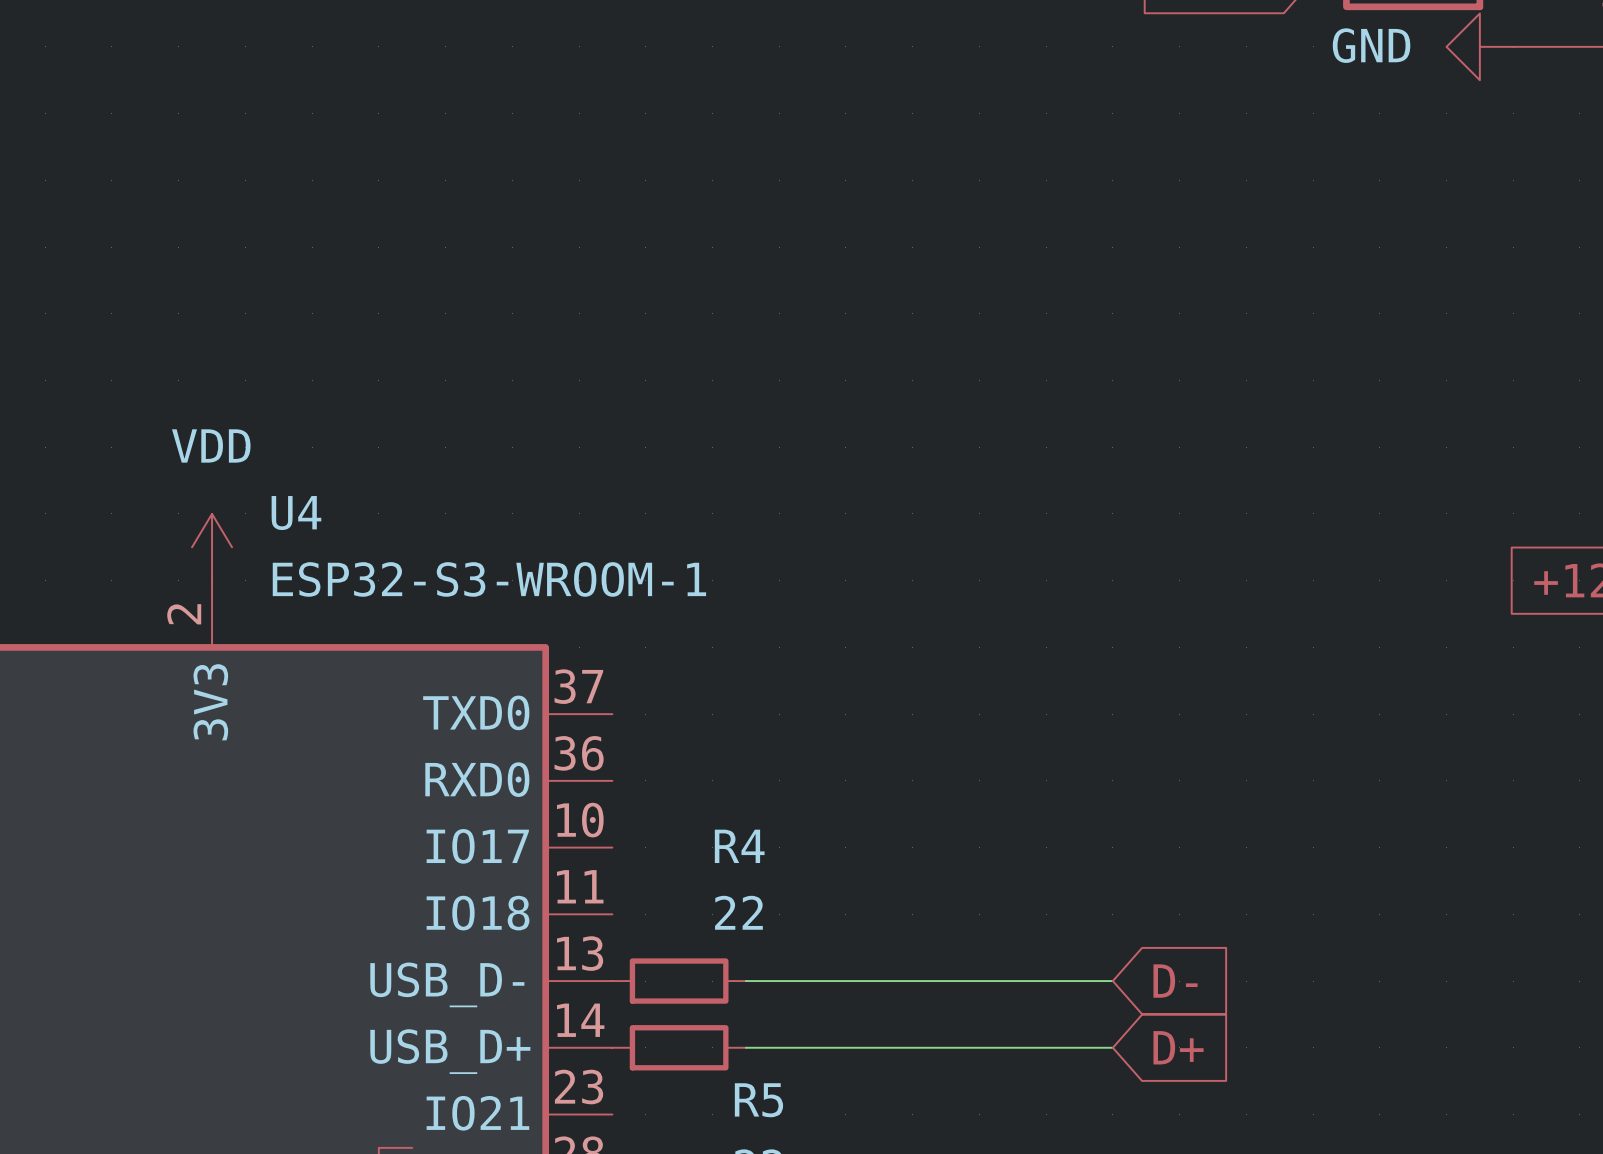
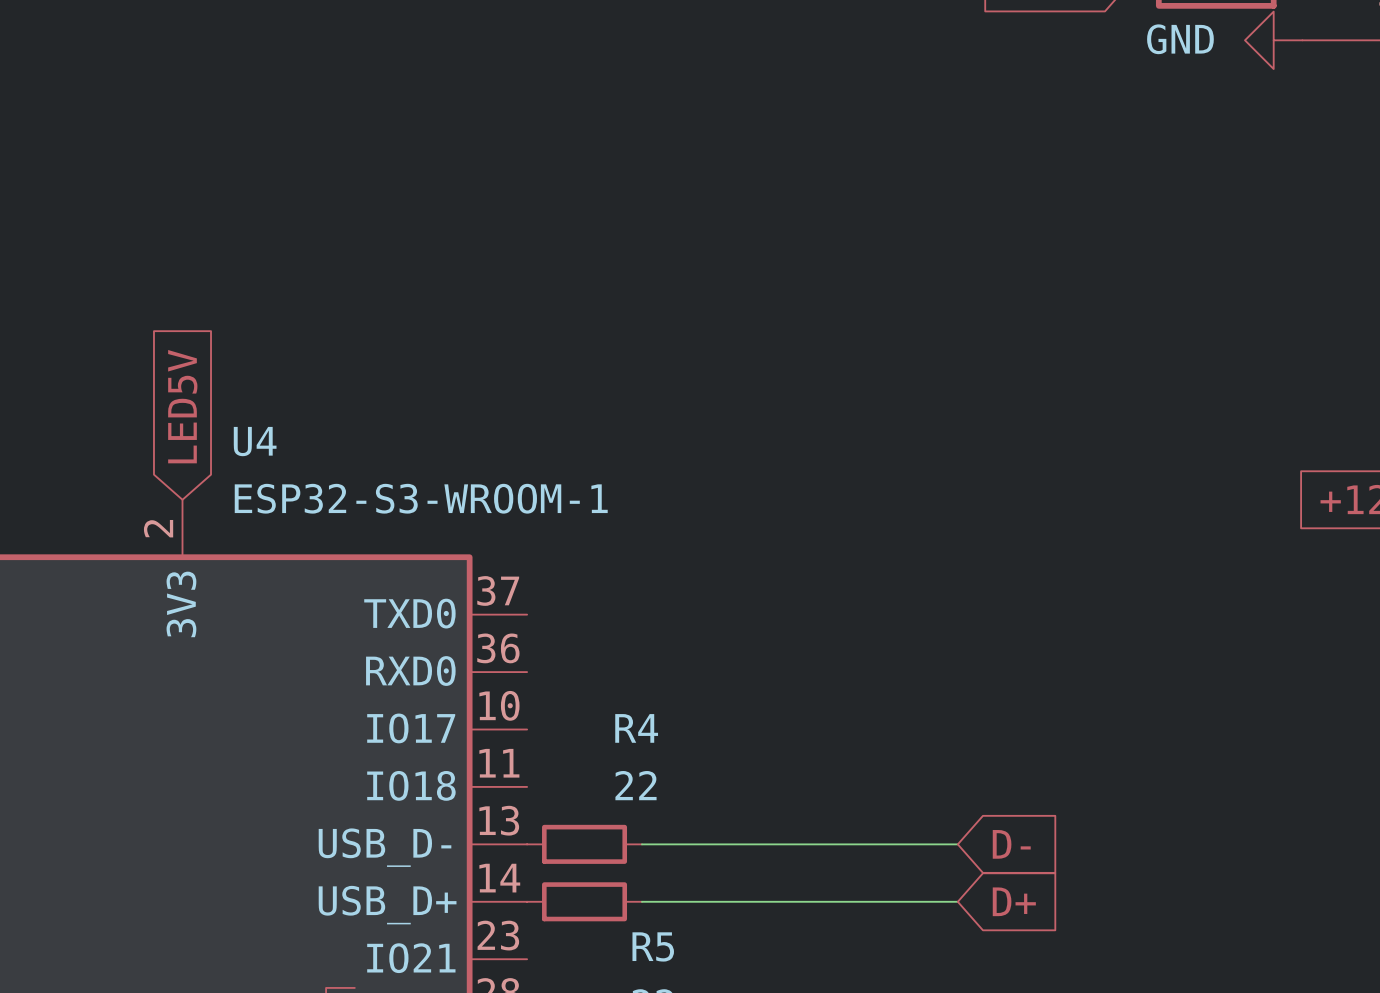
global label: none -> LED5V (182, 406)
power symbol: VDD (212, 547) -> none

